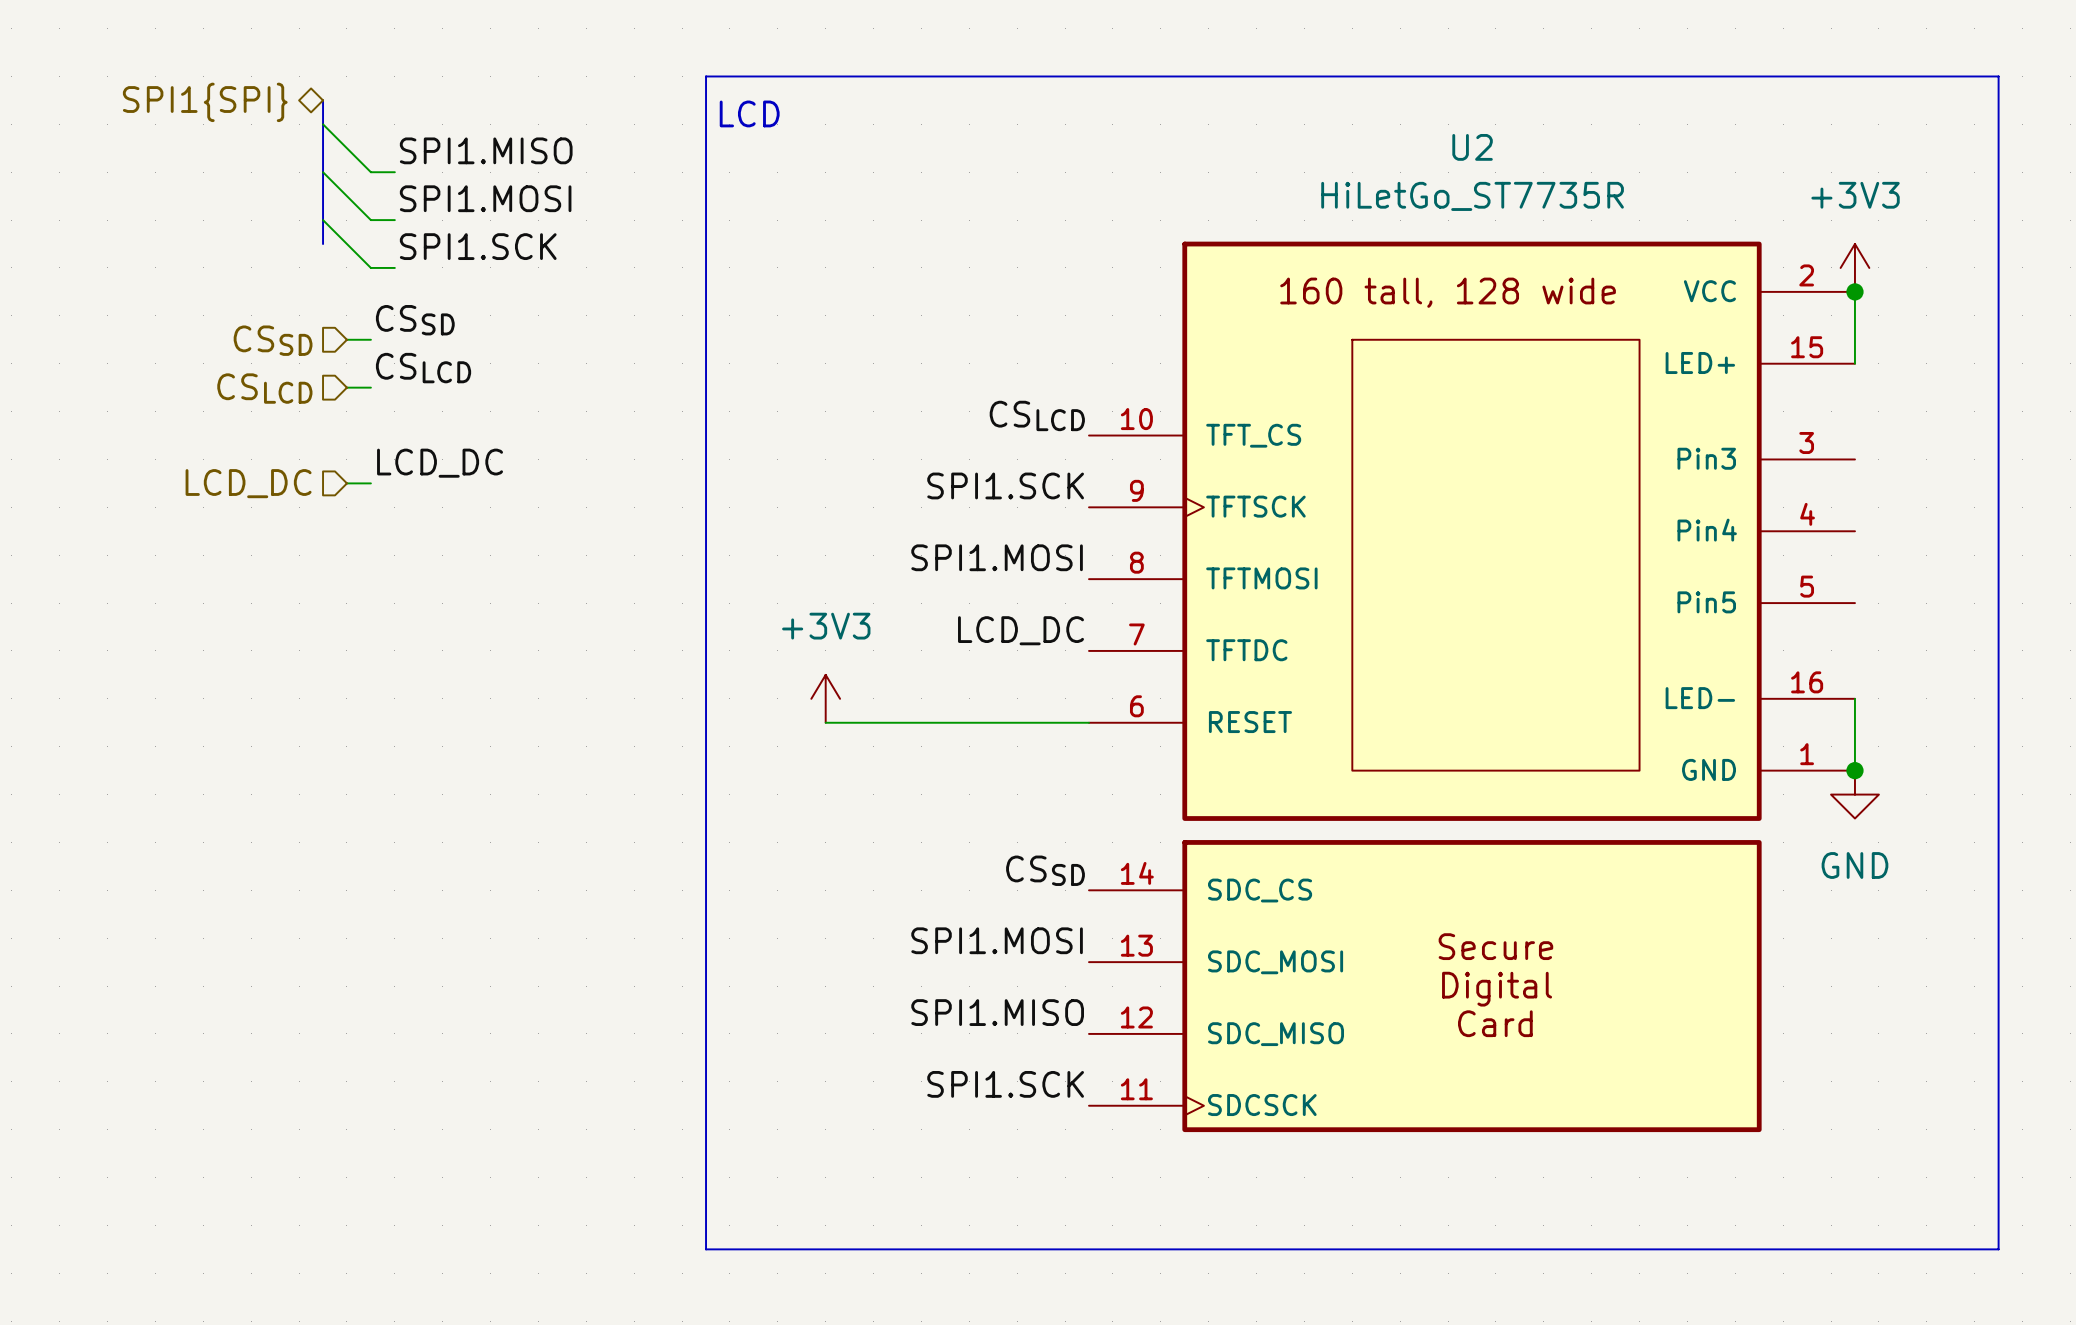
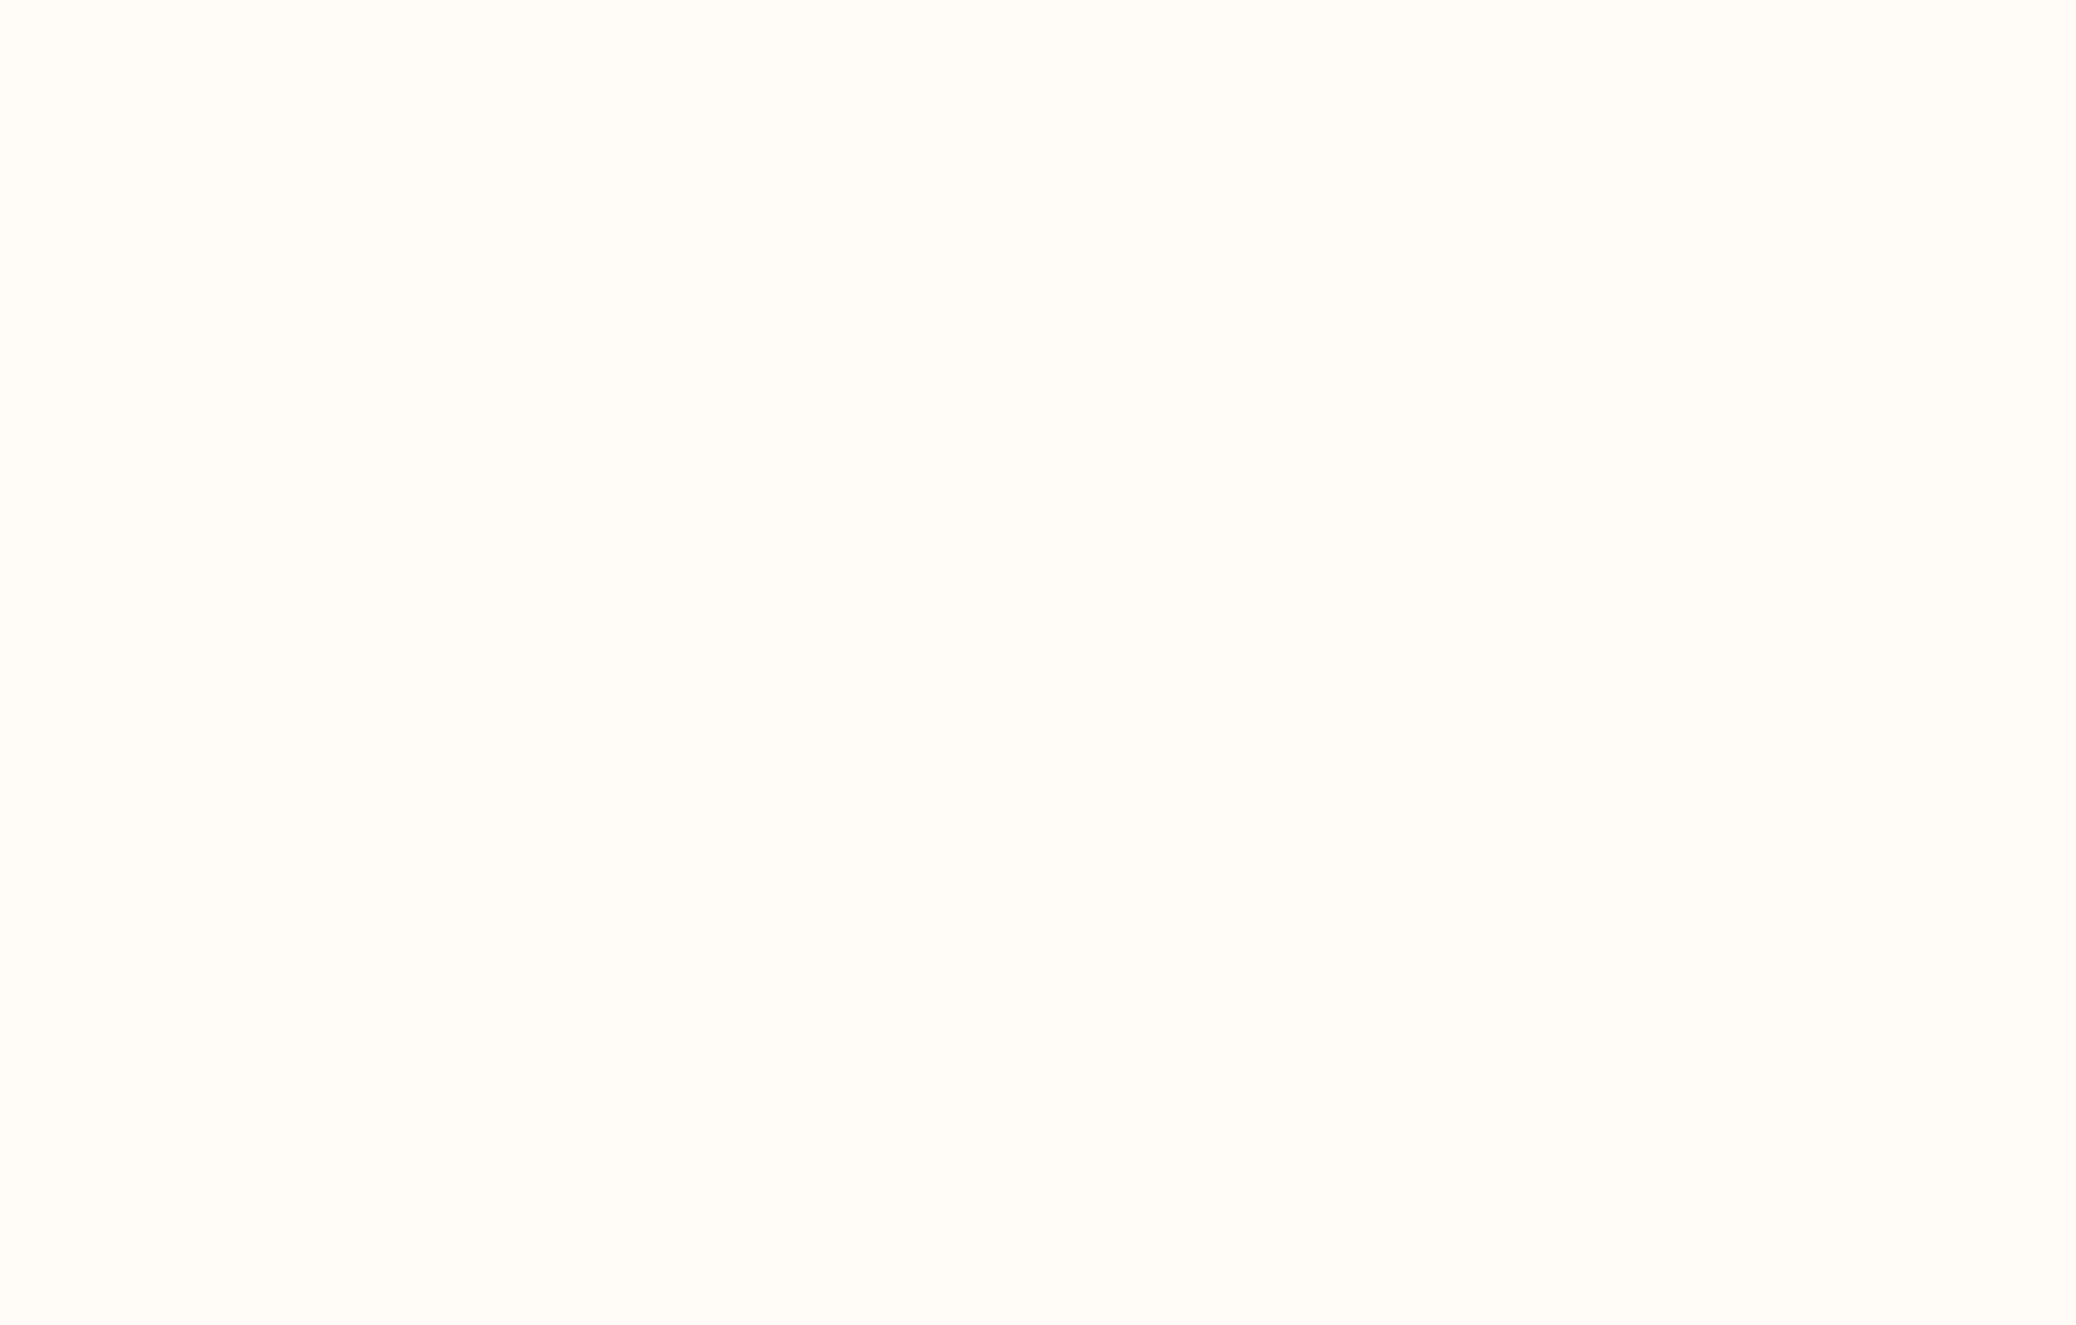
line: (706, 76) (1998, 76) (1998, 1249) (706, 1249) (706, 76) -> none
bus: (323, 100) (323, 244) -> none
hierarchical label: SPI1{SPI} (205, 102) -> none
text: LCD (749, 113) -> none
wire: (323, 124) (370, 172) (394, 172) -> none
label: SPI1.MISO (486, 150) -> none
wire: (323, 172) (370, 220) (394, 220) -> none
label: SPI1.MOSI (485, 198) -> none
wire: (323, 220) (370, 267) (394, 267) -> none
label: SPI1.SCK (478, 246) -> none
power symbol: +3V3 (1854, 267) -> none
wire: (1854, 291) (1854, 363) -> none
junction: (1854, 291) -> none
label: CSSD (415, 320) -> none
wire: (346, 339) (370, 339) -> none
hierarchical label: CSSD (273, 340) -> none
label: CSLCD (423, 368) -> none
wire: (346, 387) (370, 387) -> none
hierarchical label: CSLCD (264, 388) -> none
label: CSLCD (1037, 415) -> none
label: LCD_DC (440, 463) -> none
hierarchical label: LCD_DC (248, 483) -> none
wire: (346, 483) (370, 483) -> none
label: SPI1.SCK (1005, 485) -> none
label: SPI1.MOSI (997, 557) -> none
label: LCD_DC (1021, 630) -> none
U2: HiLetGo_ST7735R (1471, 686) -> none
power symbol: +3V3 (825, 698) -> none
wire: (1854, 698) (1854, 770) -> none
wire: (825, 722) (1089, 722) -> none
junction: (1854, 770) -> none
power symbol: GND (1854, 794) -> none
label: CSSD (1045, 870) -> none
label: SPI1.MOSI (997, 940) -> none
label: SPI1.MISO (997, 1012) -> none
label: SPI1.SCK (1005, 1084) -> none

